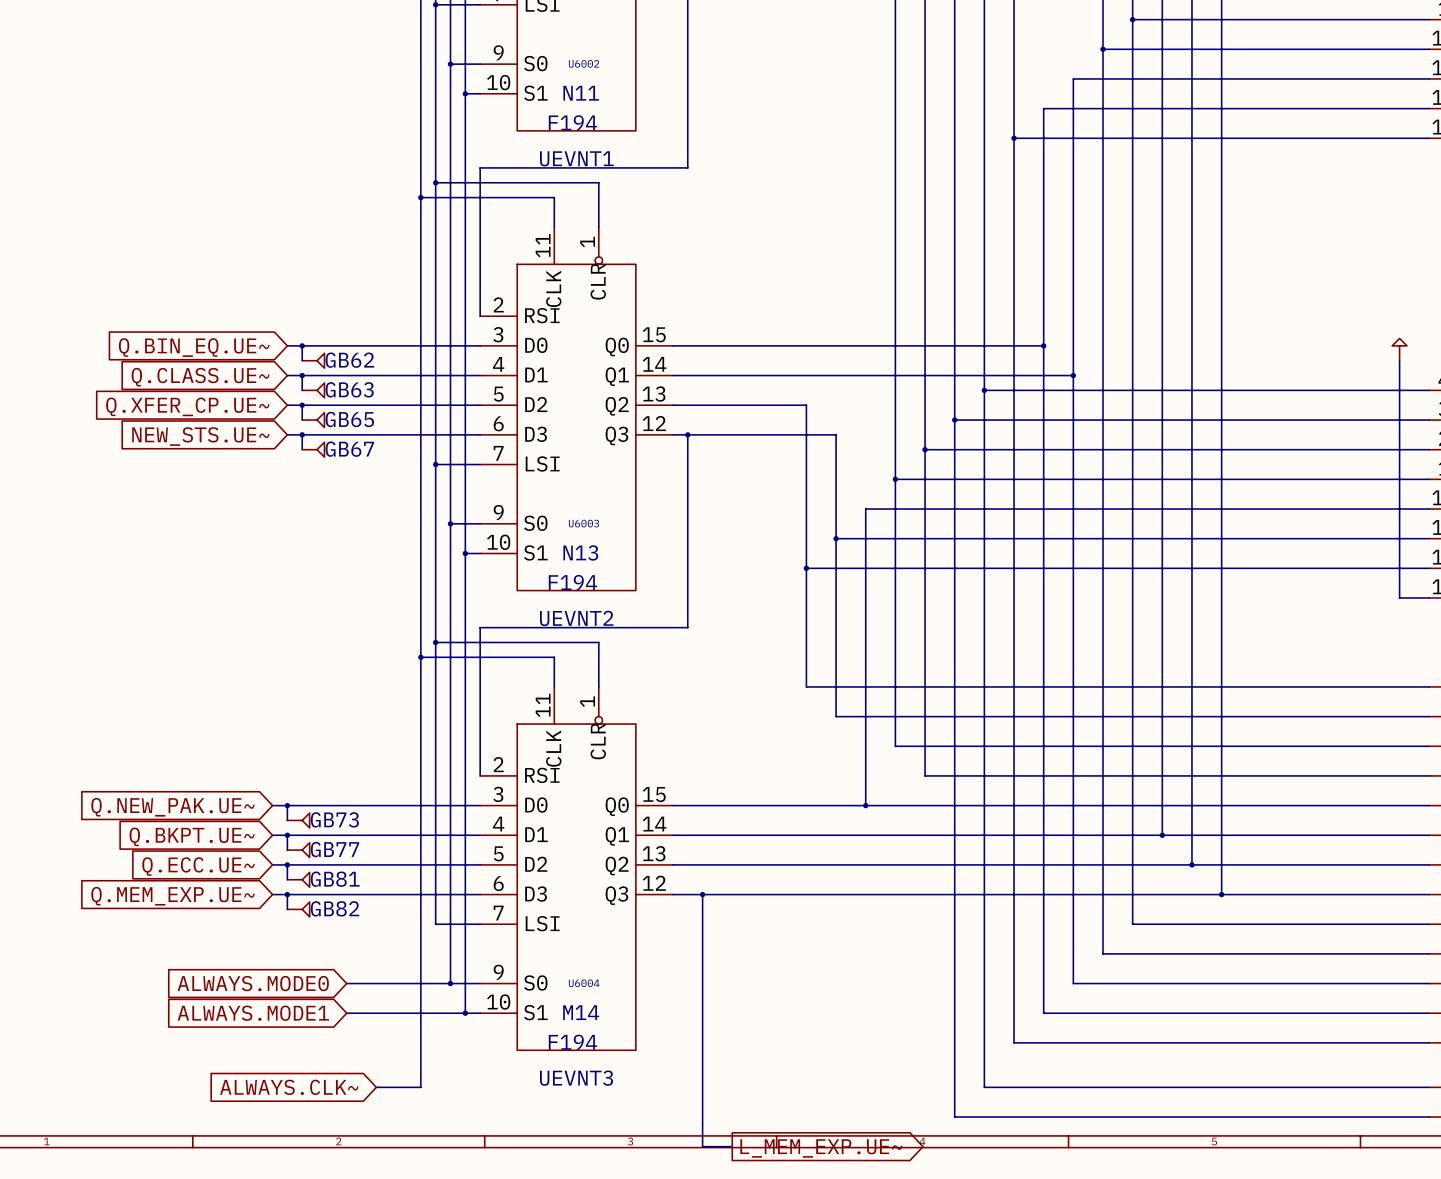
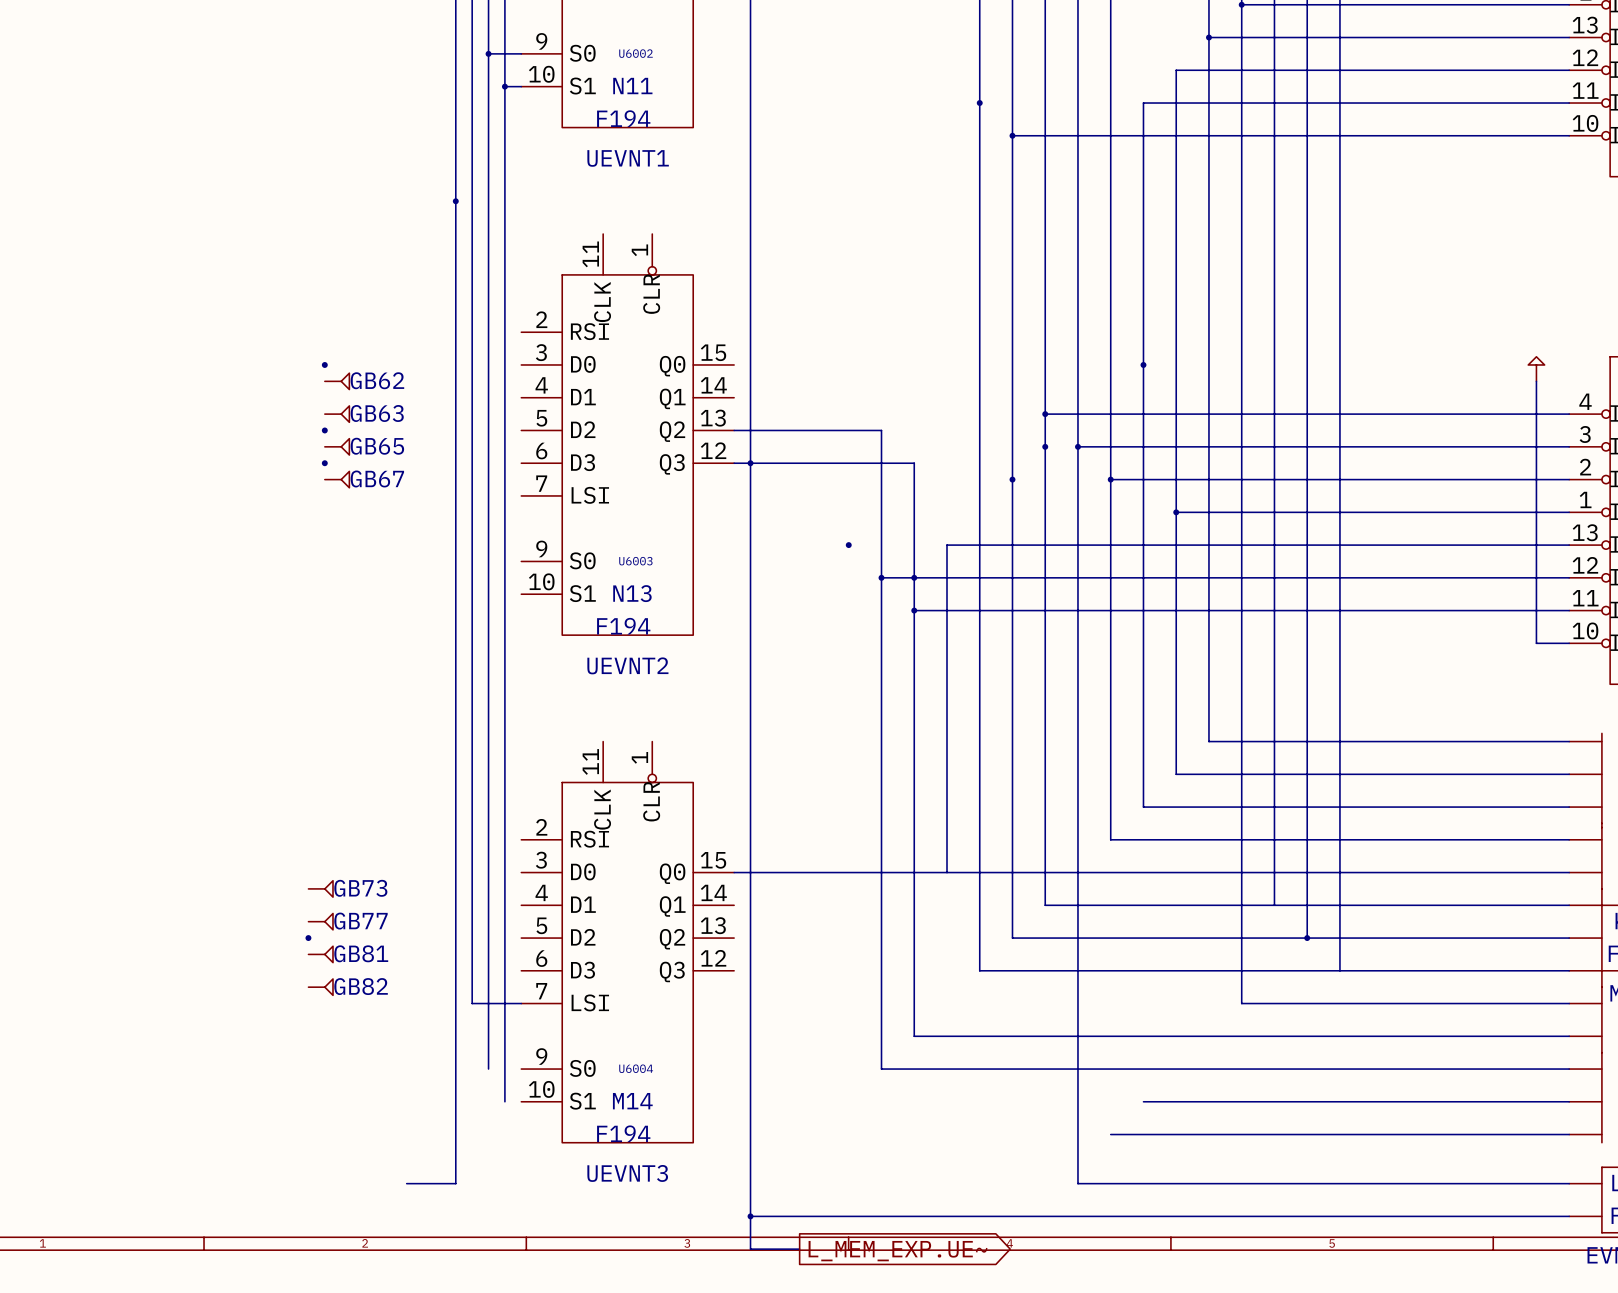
junction: none -> (979, 103)
wire: none -> (1012, 135) (1110, 135)
junction: none -> (1012, 135)
junction: (1014, 138) -> none
wire: (687, 167) (480, 167) (480, 316) -> (750, 168) (750, 463)
wire: (435, 182) (598, 182) (598, 227) -> none
junction: (435, 182) -> none
wire: (420, 197) (554, 197) (554, 227) -> none
wire: (287, 345) (480, 345) -> none
wire: (302, 345) (302, 360) -> none
wire: (672, 345) (1043, 345) -> none
global label: Q.BIN_EQ.UE~ (194, 347) -> none
wire: (287, 375) (480, 375) -> none
wire: (302, 375) (302, 390) -> none
junction: (302, 375) -> none
wire: (672, 375) (1073, 375) -> none
junction: (1073, 375) -> none
global label: Q.CLASS.UE~ (200, 377) -> none
junction: none -> (1045, 414)
junction: (984, 390) -> none
wire: (287, 405) (480, 405) -> none
wire: (302, 405) (302, 420) -> none
global label: Q.XFER_CP.UE~ (187, 406) -> none
wire: (954, 420) (984, 420) -> (1045, 414) (1077, 414)
junction: none -> (1077, 446)
wire: (287, 434) (480, 434) -> none
wire: (302, 434) (302, 449) -> none
global label: NEW_STS.UE~ (200, 436) -> none
wire: (925, 449) (1014, 449) -> none
junction: none -> (1110, 479)
wire: (435, 464) (480, 464) -> none
junction: (435, 464) -> none
wire: (895, 479) (1073, 479) -> none
junction: (895, 479) -> none
junction: none -> (1176, 512)
junction: none -> (848, 545)
wire: (450, 523) (480, 523) -> none
junction: (450, 523) -> none
junction: none -> (881, 577)
wire: (465, 553) (480, 553) -> none
junction: (465, 553) -> none
wire: (806, 568) (836, 568) -> (881, 577) (914, 577)
junction: (806, 568) -> none
junction: none -> (914, 610)
wire: (687, 627) (480, 627) (480, 775) -> none
wire: (435, 642) (598, 642) (598, 686) -> none
junction: (435, 642) -> none
wire: (420, 657) (554, 657) (554, 686) -> none
junction: (420, 657) -> none
wire: (806, 686) (1103, 686) (1103, 953) -> (914, 774) (914, 1036) (1208, 1036)
wire: (836, 716) (1073, 716) (1073, 983) -> (881, 741) (881, 1069) (1176, 1069)
wire: (895, 746) (1043, 746) (1043, 1013) -> (979, 807) (979, 970)
wire: (925, 775) (1014, 775) (1014, 1042) -> (1012, 839) (1012, 938)
wire: (272, 805) (480, 805) -> none
wire: (287, 805) (287, 820) -> none
junction: (287, 805) -> none
junction: (865, 805) -> none
global label: Q.NEW_PAK.UE~ (173, 807) -> none
wire: (272, 835) (480, 835) -> none
wire: (287, 835) (287, 850) -> none
junction: (287, 835) -> none
wire: (672, 835) (954, 835) (954, 1117) -> (750, 1216) (1045, 1216)
junction: (1162, 835) -> none
global label: Q.BKPT.UE~ (192, 836) -> none
wire: (272, 864) (480, 864) -> none
wire: (287, 864) (287, 879) -> none
wire: (672, 864) (925, 864) -> none
global label: Q.ECC.UE~ (198, 866) -> none
wire: (272, 894) (480, 894) -> none
wire: (287, 894) (287, 909) -> none
junction: (287, 894) -> none
wire: (672, 894) (895, 894) -> none
wire: (702, 894) (702, 1146) -> (750, 676) (750, 1249) (766, 1249)
junction: (702, 894) -> none
junction: (1221, 894) -> none
global label: Q.MEM_EXP.UE~ (173, 896) -> none
global label: ALWAYS.MODE0 (253, 983) -> none
wire: (346, 983) (480, 983) -> none
junction: (450, 983) -> none
global label: ALWAYS.MODE1 (253, 1013) -> none
wire: (346, 1013) (480, 1013) -> none
junction: (465, 1013) -> none
global label: ALWAYS.CLK~ (289, 1087) -> none
junction: none -> (750, 1216)

